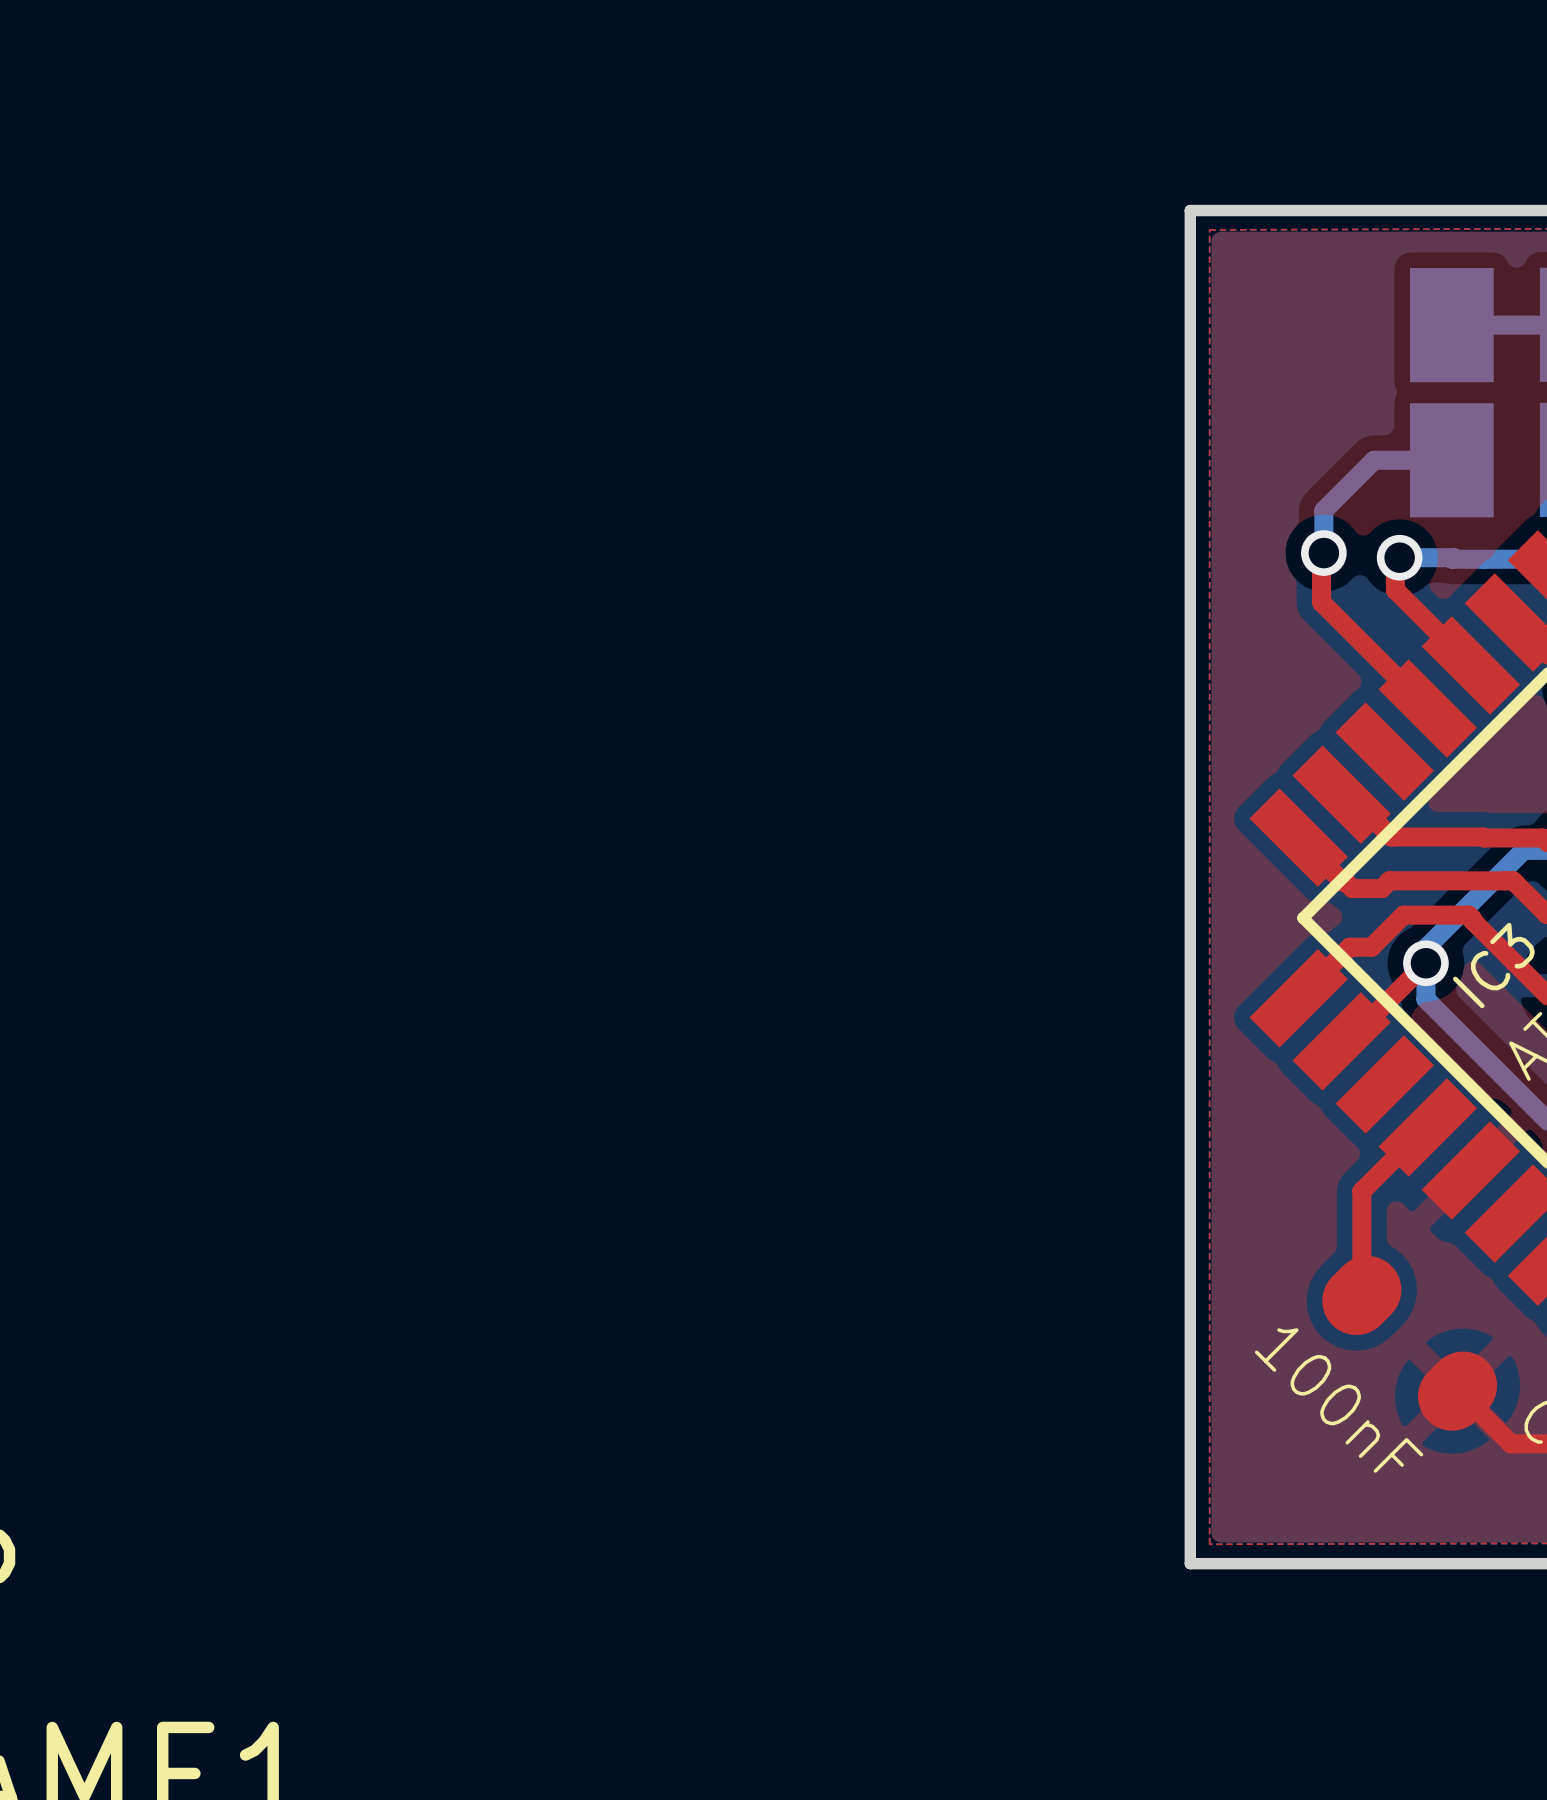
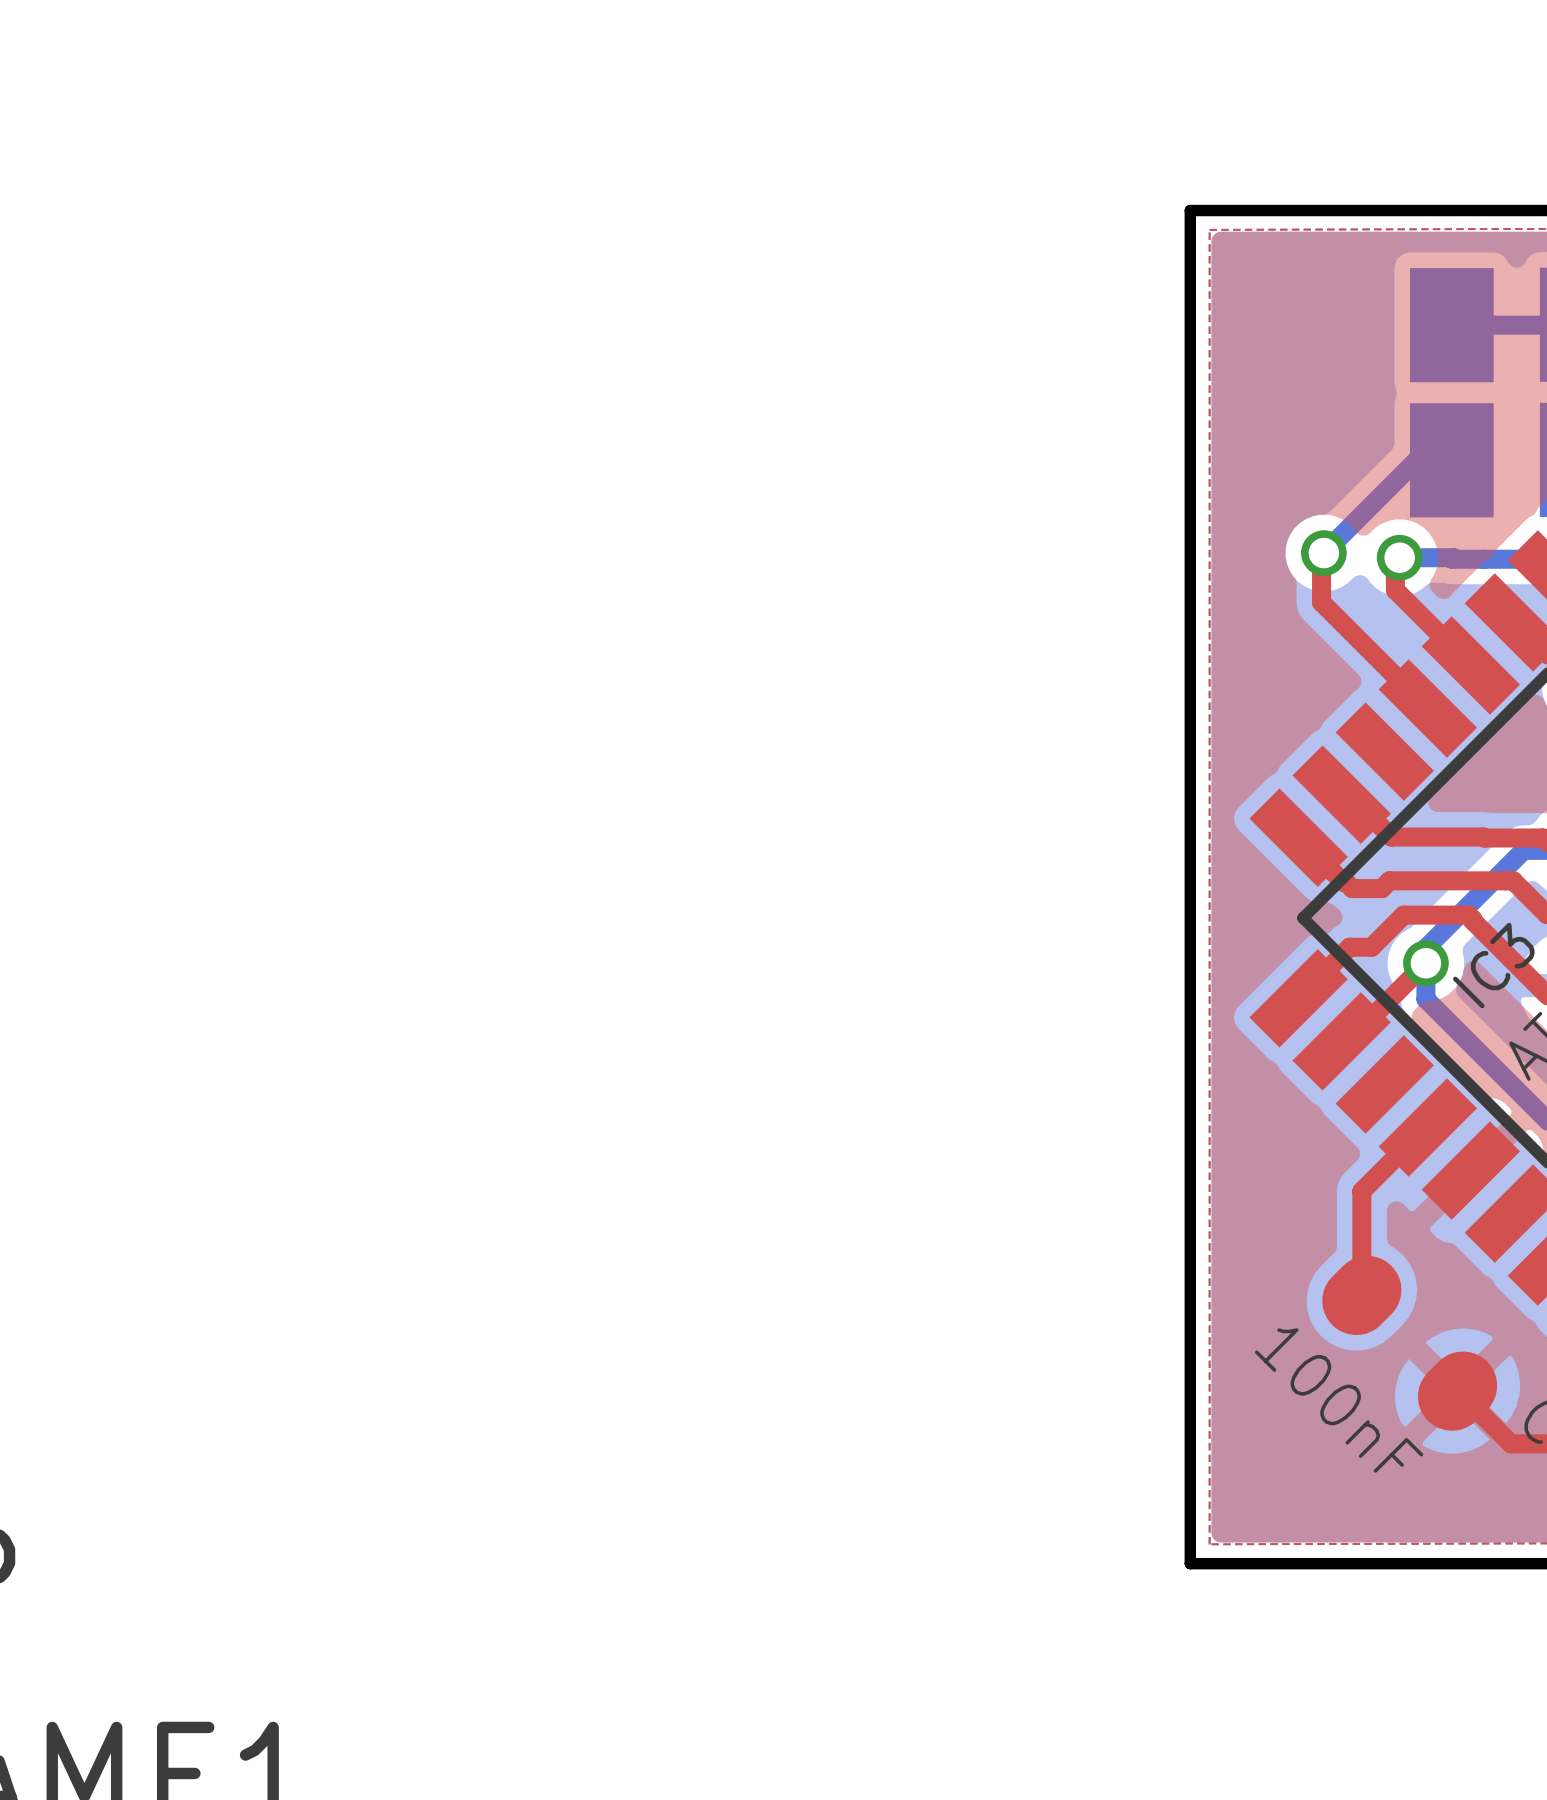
bottom track: (1416, 460) (1374, 460) (1323, 510) (1323, 553) -> (1416, 460) (1323, 553)

